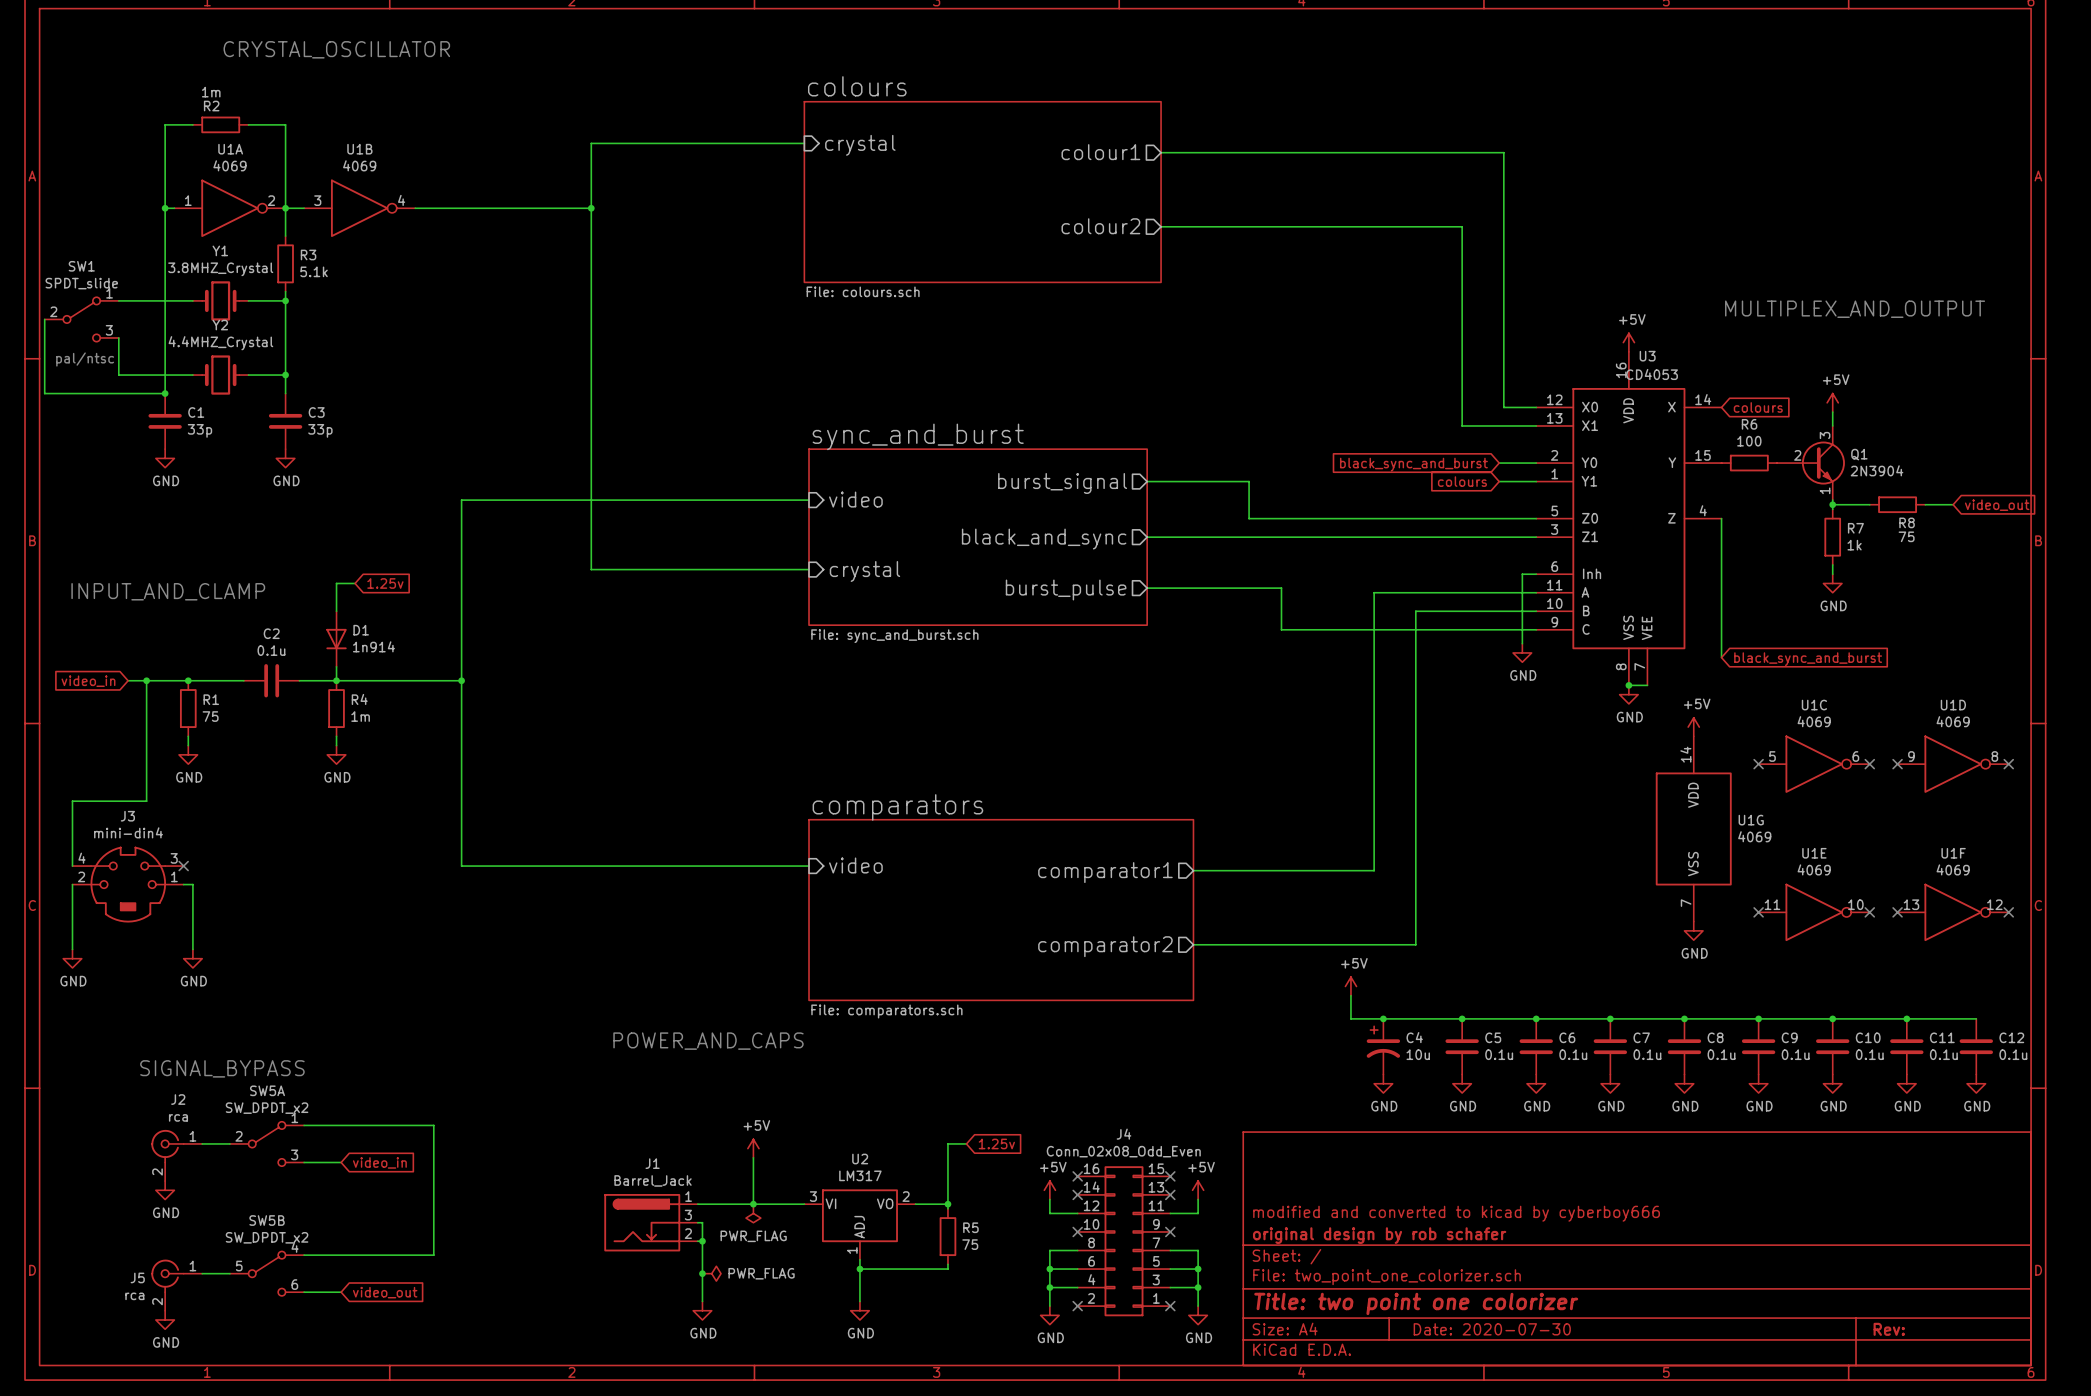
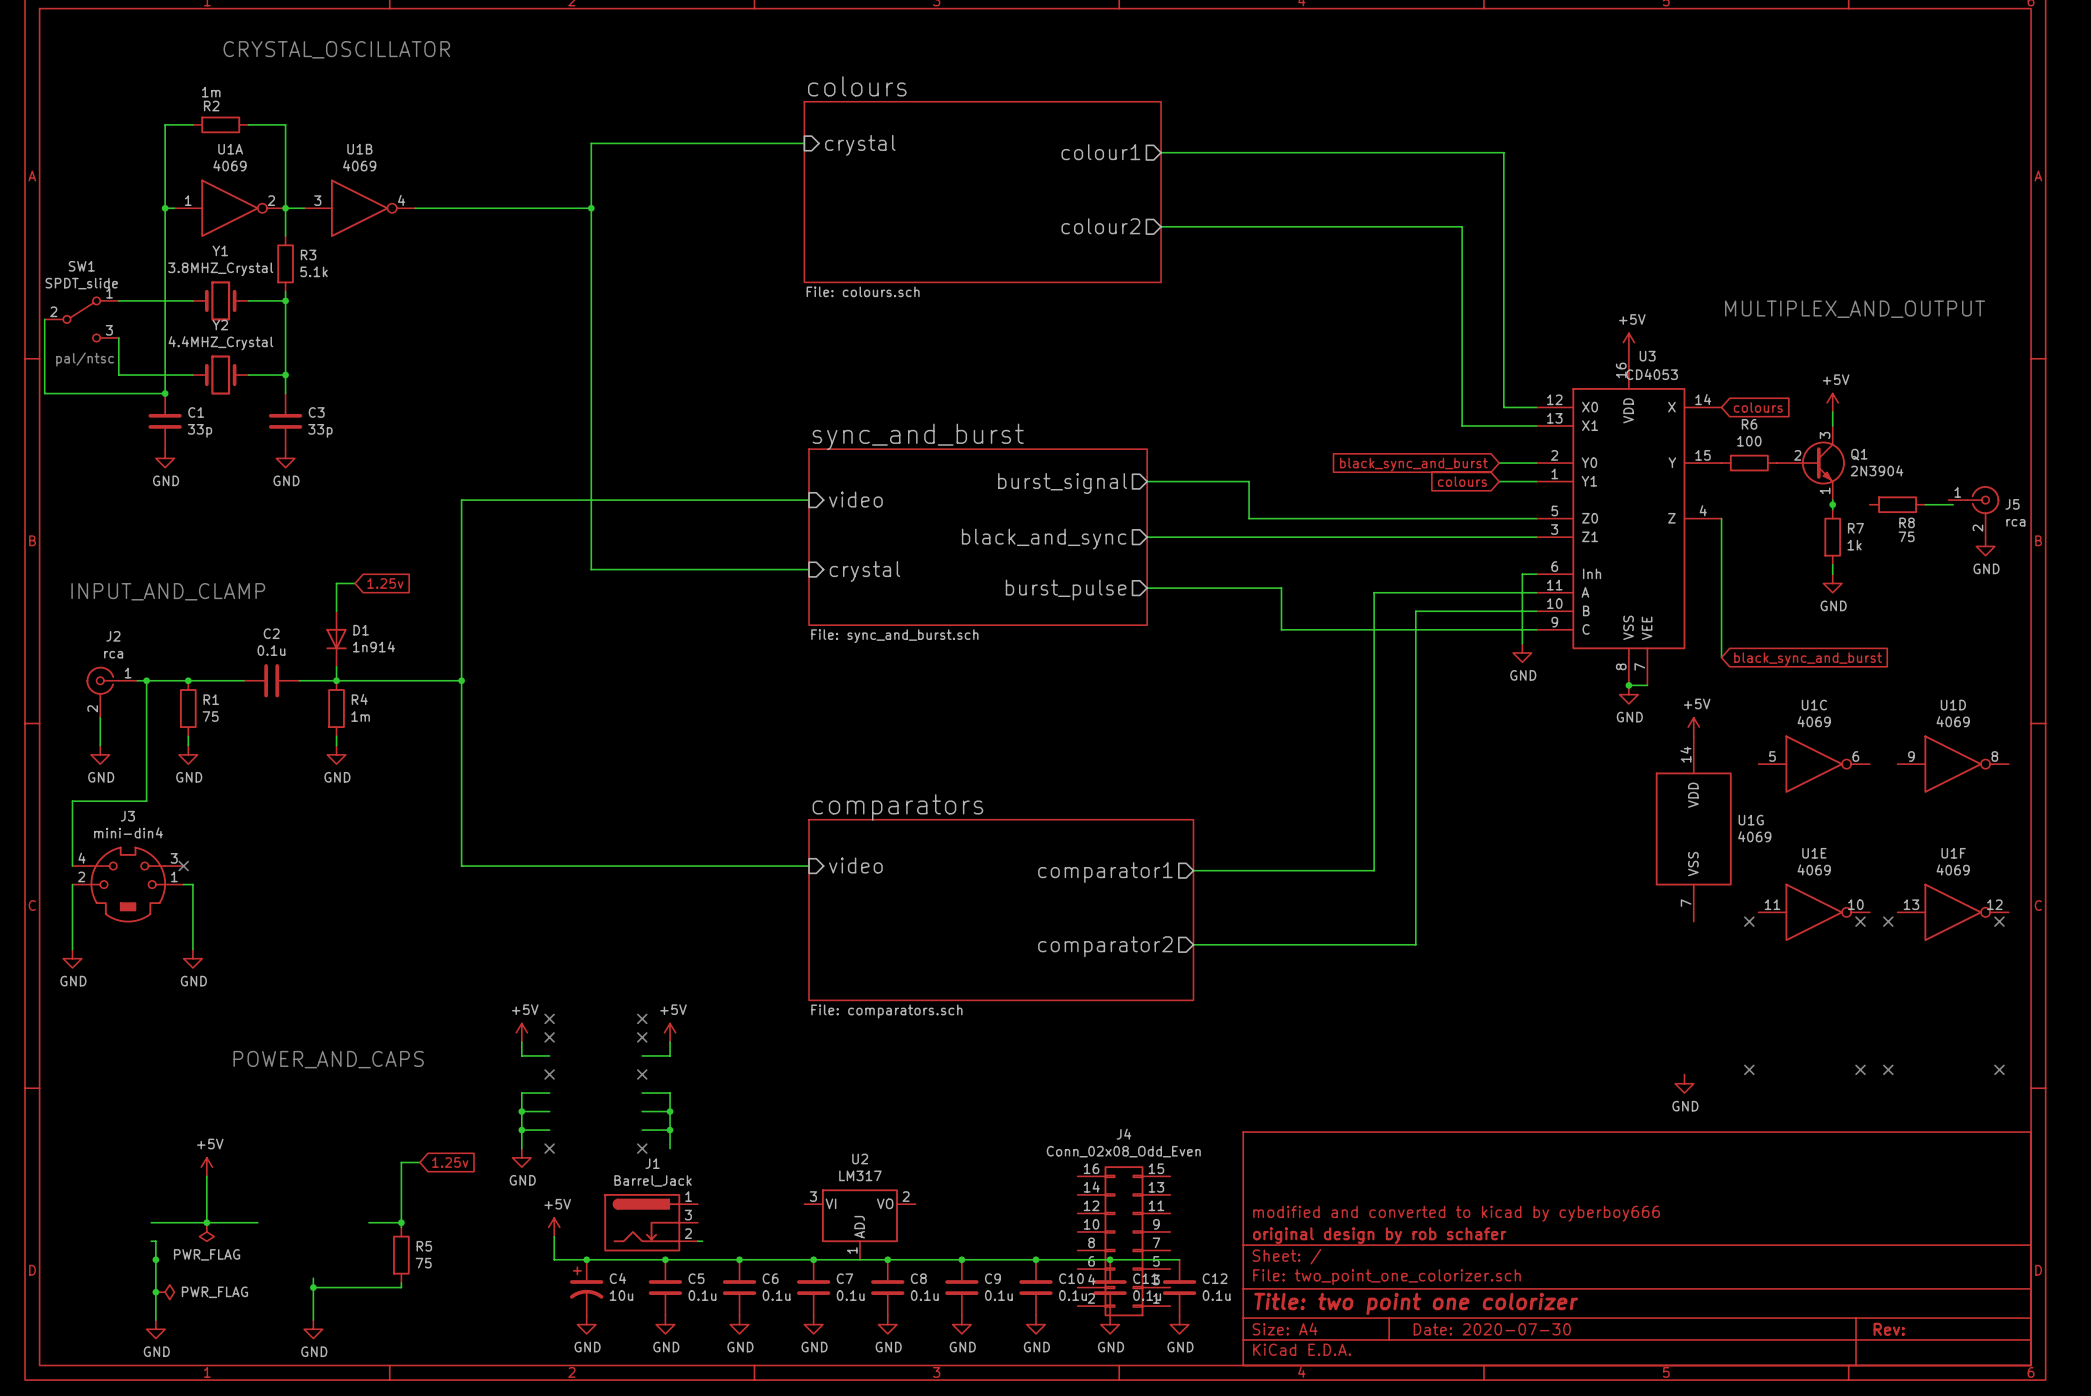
wire: (1832, 504) (1869, 504) -> none
global label: video_out (1997, 505) -> none
power symbol: none -> GND (1985, 546)
global label: video_in (88, 681) -> none
wire: none -> (100, 717) (100, 745)
power symbol: none -> GND (100, 754)
no-connect mark: (1758, 764) -> none
no-connect mark: (1869, 764) -> none
no-connect mark: (1897, 764) -> none
no-connect mark: (2008, 764) -> none
no-connect mark position: (1758, 912) -> (1749, 921)
no-connect mark: (1869, 912) -> none
no-connect mark: (1897, 912) -> none
no-connect mark position: (2008, 912) -> (1999, 921)
no-connect mark: none -> (1860, 921)
no-connect mark: none -> (1888, 921)
power symbol: GND (1693, 930) -> none
power symbol: +5V (1350, 986) -> none
wire: (1350, 995) (1350, 1018) (1976, 1018) -> none
no-connect mark: none -> (549, 1018)
no-connect mark: none -> (642, 1018)
junction: (1383, 1018) -> none
junction: (1462, 1018) -> none
junction: (1536, 1018) -> none
junction: (1610, 1018) -> none
junction: (1684, 1018) -> none
junction: (1758, 1018) -> none
junction: (1832, 1018) -> none
junction: (1906, 1018) -> none
power symbol: none -> +5V (521, 1032)
power symbol: none -> +5V (670, 1032)
no-connect mark: none -> (549, 1037)
no-connect mark: none -> (642, 1037)
text: POWER_AND_CAPS (708, 1041) -> none
wire: none -> (521, 1042) (521, 1055) (549, 1055)
wire: none -> (670, 1042) (670, 1055) (642, 1055)
C4 position: (1383, 1046) -> (586, 1287)
C5 position: (1462, 1046) -> (665, 1287)
C6 position: (1536, 1046) -> (739, 1287)
C7 position: (1610, 1046) -> (813, 1287)
C8 position: (1684, 1046) -> (887, 1287)
C9 position: (1758, 1046) -> (961, 1287)
C10 position: (1832, 1046) -> (1035, 1287)
C11 position: (1906, 1046) -> (1110, 1287)
C12 position: (1976, 1046) -> (1179, 1287)
text: none -> POWER_AND_CAPS (328, 1059)
text: SIGNAL_BYPASS (222, 1068) -> none
no-connect mark: none -> (1749, 1069)
no-connect mark: none -> (1860, 1069)
no-connect mark: none -> (1888, 1069)
no-connect mark: none -> (1999, 1069)
no-connect mark: none -> (549, 1074)
no-connect mark: none -> (642, 1074)
power symbol: GND (1383, 1083) -> none
power symbol: GND (1462, 1083) -> none
power symbol: GND (1536, 1083) -> none
power symbol: GND (1610, 1083) -> none
power symbol: GND (1758, 1083) -> none
power symbol: GND (1832, 1083) -> none
power symbol: GND (1906, 1083) -> none
power symbol: GND (1976, 1083) -> none
wire: none -> (549, 1093) (521, 1093) (521, 1148)
wire: none -> (642, 1093) (670, 1093) (670, 1148)
wire: none -> (521, 1111) (549, 1111)
junction: none -> (521, 1111)
wire: none -> (642, 1111) (670, 1111)
junction: none -> (670, 1111)
wire: (304, 1125) (433, 1125) (433, 1255) (304, 1255) -> none
wire: none -> (521, 1130) (549, 1130)
junction: none -> (521, 1130)
wire: none -> (642, 1130) (670, 1130)
junction: none -> (670, 1130)
wire: (202, 1143) (229, 1143) -> none
SW5A: SW_DPDT_x2 (267, 1143) -> none
wire: (966, 1143) (947, 1143) (947, 1208) -> none
global label: 1.25v (996, 1143) -> none
no-connect mark: none -> (549, 1148)
no-connect mark: none -> (642, 1148)
power symbol: +5V (753, 1148) -> none
J2 position: (176, 1155) -> (111, 692)
power symbol: none -> GND (521, 1157)
wire: (753, 1157) (753, 1204) -> none
wire: (304, 1162) (341, 1162) -> none
global label: video_in (379, 1162) -> none
wire: none -> (419, 1162) (401, 1162) (401, 1227)
global label: none -> 1.25v (450, 1162)
power symbol: none -> +5V (206, 1167)
wire: none -> (206, 1176) (206, 1222)
no-connect mark: (1077, 1176) -> none
no-connect mark: (1170, 1176) -> none
power symbol: GND (165, 1190) -> none
power symbol: +5V (1049, 1190) -> none
power symbol: +5V (1198, 1190) -> none
no-connect mark: (1077, 1194) -> none
no-connect mark: (1170, 1194) -> none
wire: (1049, 1199) (1049, 1213) (1077, 1213) -> none
wire: (1198, 1199) (1198, 1213) (1170, 1213) -> none
wire: (697, 1204) (804, 1204) -> none
junction: (753, 1204) -> none
wire: (915, 1204) (947, 1204) -> none
junction: (947, 1204) -> none
power symbol: PWR_FLAG (753, 1213) -> none
wire: none -> (151, 1222) (257, 1222)
junction: none -> (206, 1222)
wire: none -> (368, 1222) (401, 1222)
junction: none -> (401, 1222)
wire: (697, 1222) (702, 1222) (702, 1301) -> none
power symbol: none -> +5V (554, 1227)
power symbol: none -> PWR_FLAG (206, 1231)
no-connect mark: (1077, 1231) -> none
no-connect mark: (1170, 1231) -> none
wire: none -> (554, 1236) (554, 1259) (1179, 1259)
R5 position: (947, 1236) -> (401, 1255)
wire: none -> (151, 1241) (155, 1241) (155, 1319)
junction: (702, 1241) -> none
wire: (1077, 1250) (1049, 1250) (1049, 1306) -> none
wire: (1170, 1250) (1198, 1250) (1198, 1306) -> none
junction: none -> (155, 1259)
junction: none -> (586, 1259)
junction: none -> (665, 1259)
junction: none -> (739, 1259)
junction: none -> (813, 1259)
wire: (859, 1259) (859, 1301) -> none
junction: none -> (887, 1259)
junction: none -> (961, 1259)
junction: none -> (1035, 1259)
junction: none -> (1110, 1259)
wire: (947, 1264) (947, 1269) (859, 1269) -> none
junction: (859, 1269) -> none
wire: (1049, 1269) (1077, 1269) -> none
junction: (1049, 1269) -> none
wire: (1170, 1269) (1198, 1269) -> none
junction: (1198, 1269) -> none
wire: (202, 1273) (229, 1273) -> none
SW5B: SW_DPDT_x2 (267, 1273) -> none
junction: (702, 1273) -> none
power symbol: PWR_FLAG (711, 1273) -> none
J5 flip: as is (167, 1275) -> left-right (1983, 502)
wire: none -> (313, 1278) (313, 1319)
wire: none -> (401, 1282) (401, 1287) (313, 1287)
J5 position: (176, 1285) -> (1973, 511)
junction: none -> (313, 1287)
wire: (1049, 1287) (1077, 1287) -> none
junction: (1049, 1287) -> none
wire: (1170, 1287) (1198, 1287) -> none
junction: (1198, 1287) -> none
junction: none -> (155, 1292)
power symbol: none -> PWR_FLAG (165, 1292)
wire: (304, 1292) (341, 1292) -> none
global label: video_out (385, 1292) -> none
no-connect mark: (1077, 1306) -> none
no-connect mark: (1170, 1306) -> none
power symbol: GND (702, 1310) -> none
power symbol: GND (859, 1310) -> none
power symbol position: GND (1049, 1315) -> GND (1035, 1324)
power symbol position: GND (1198, 1315) -> GND (1179, 1324)
power symbol position: GND (165, 1319) -> GND (155, 1329)
power symbol: none -> GND (586, 1324)
power symbol: none -> GND (665, 1324)
power symbol: none -> GND (739, 1324)
power symbol: none -> GND (813, 1324)
power symbol: none -> GND (887, 1324)
power symbol: none -> GND (961, 1324)
power symbol: none -> GND (1110, 1324)
power symbol: none -> GND (313, 1329)

